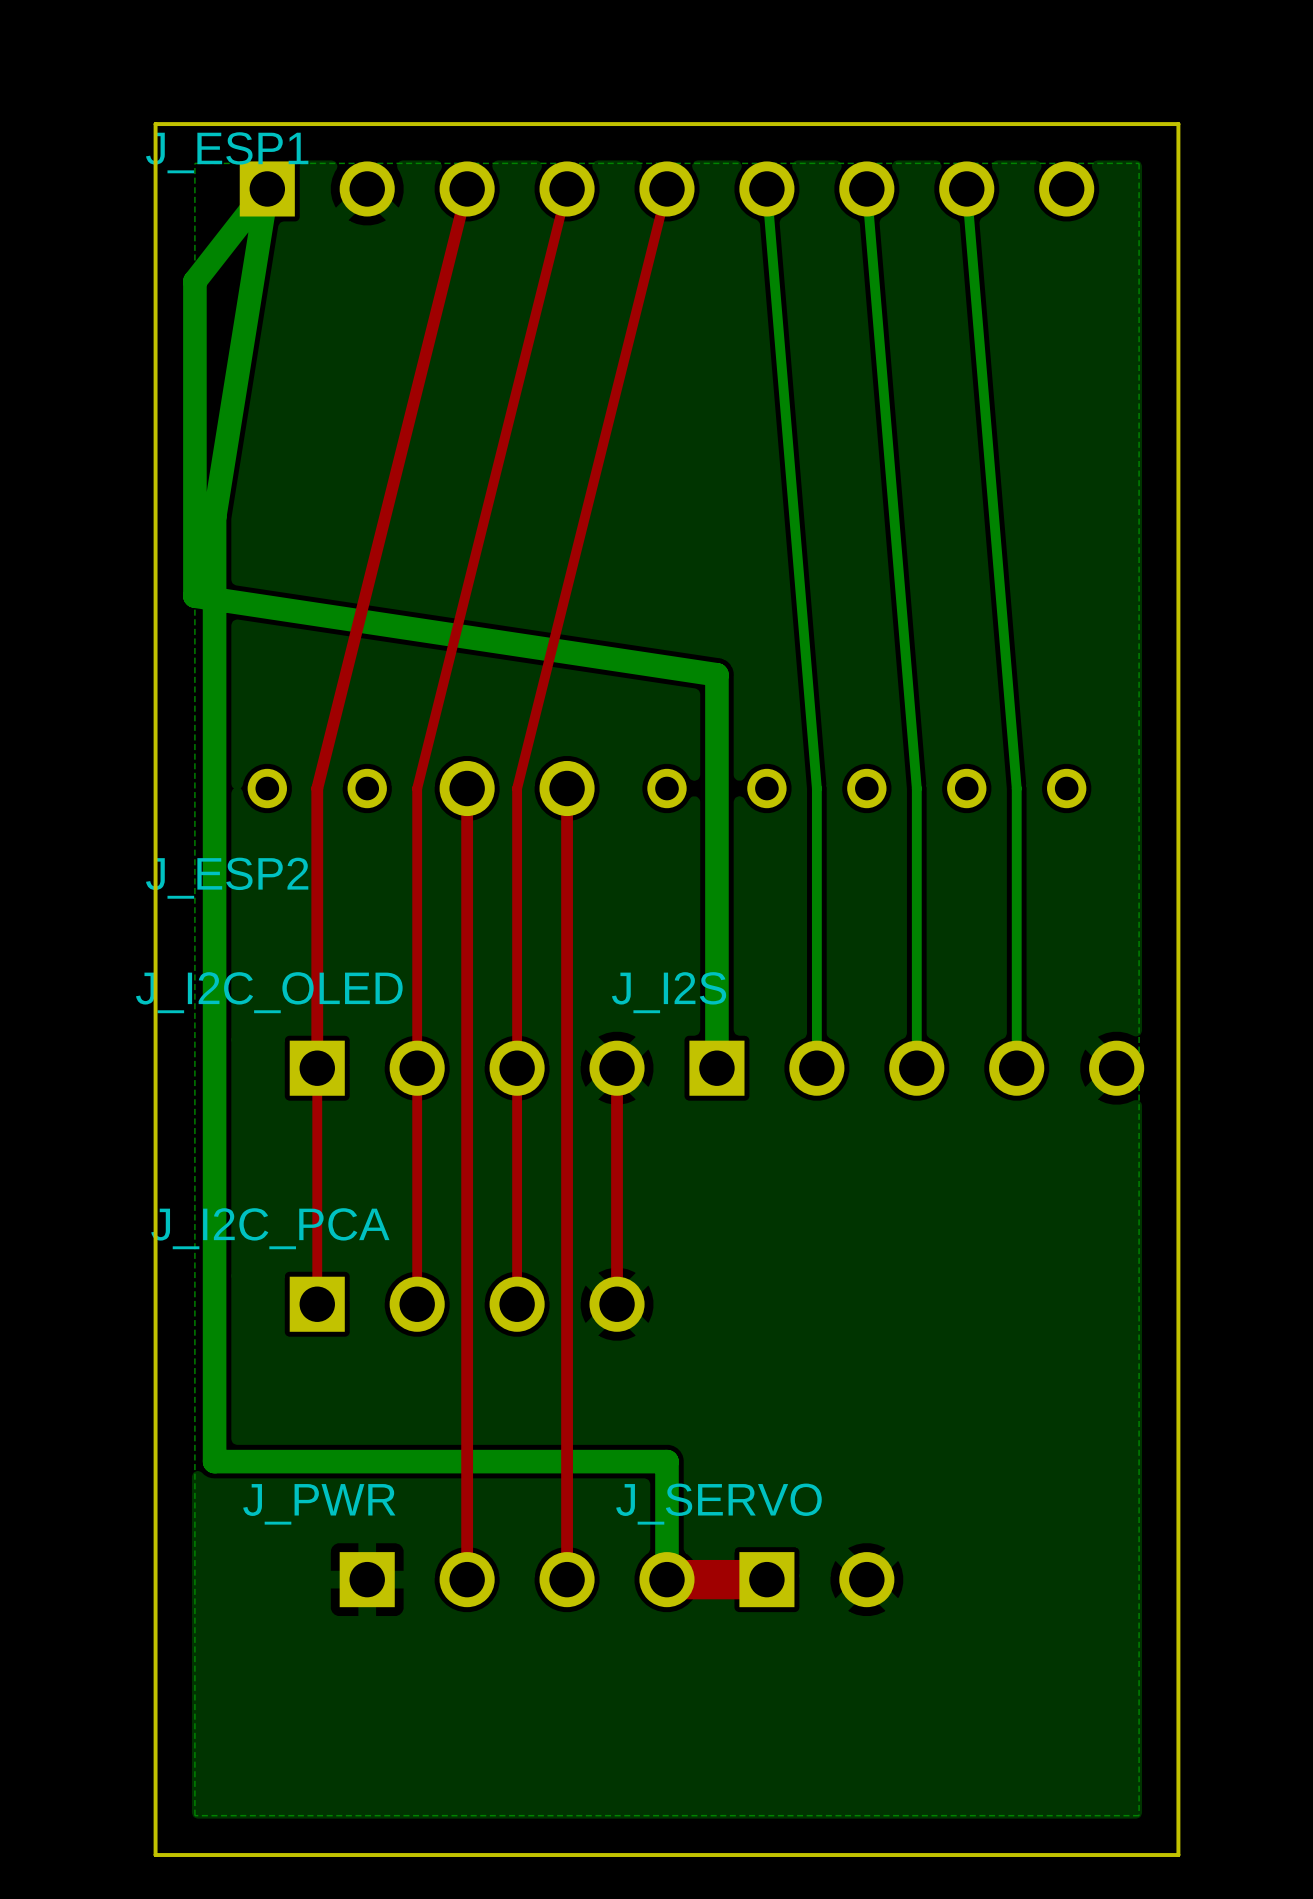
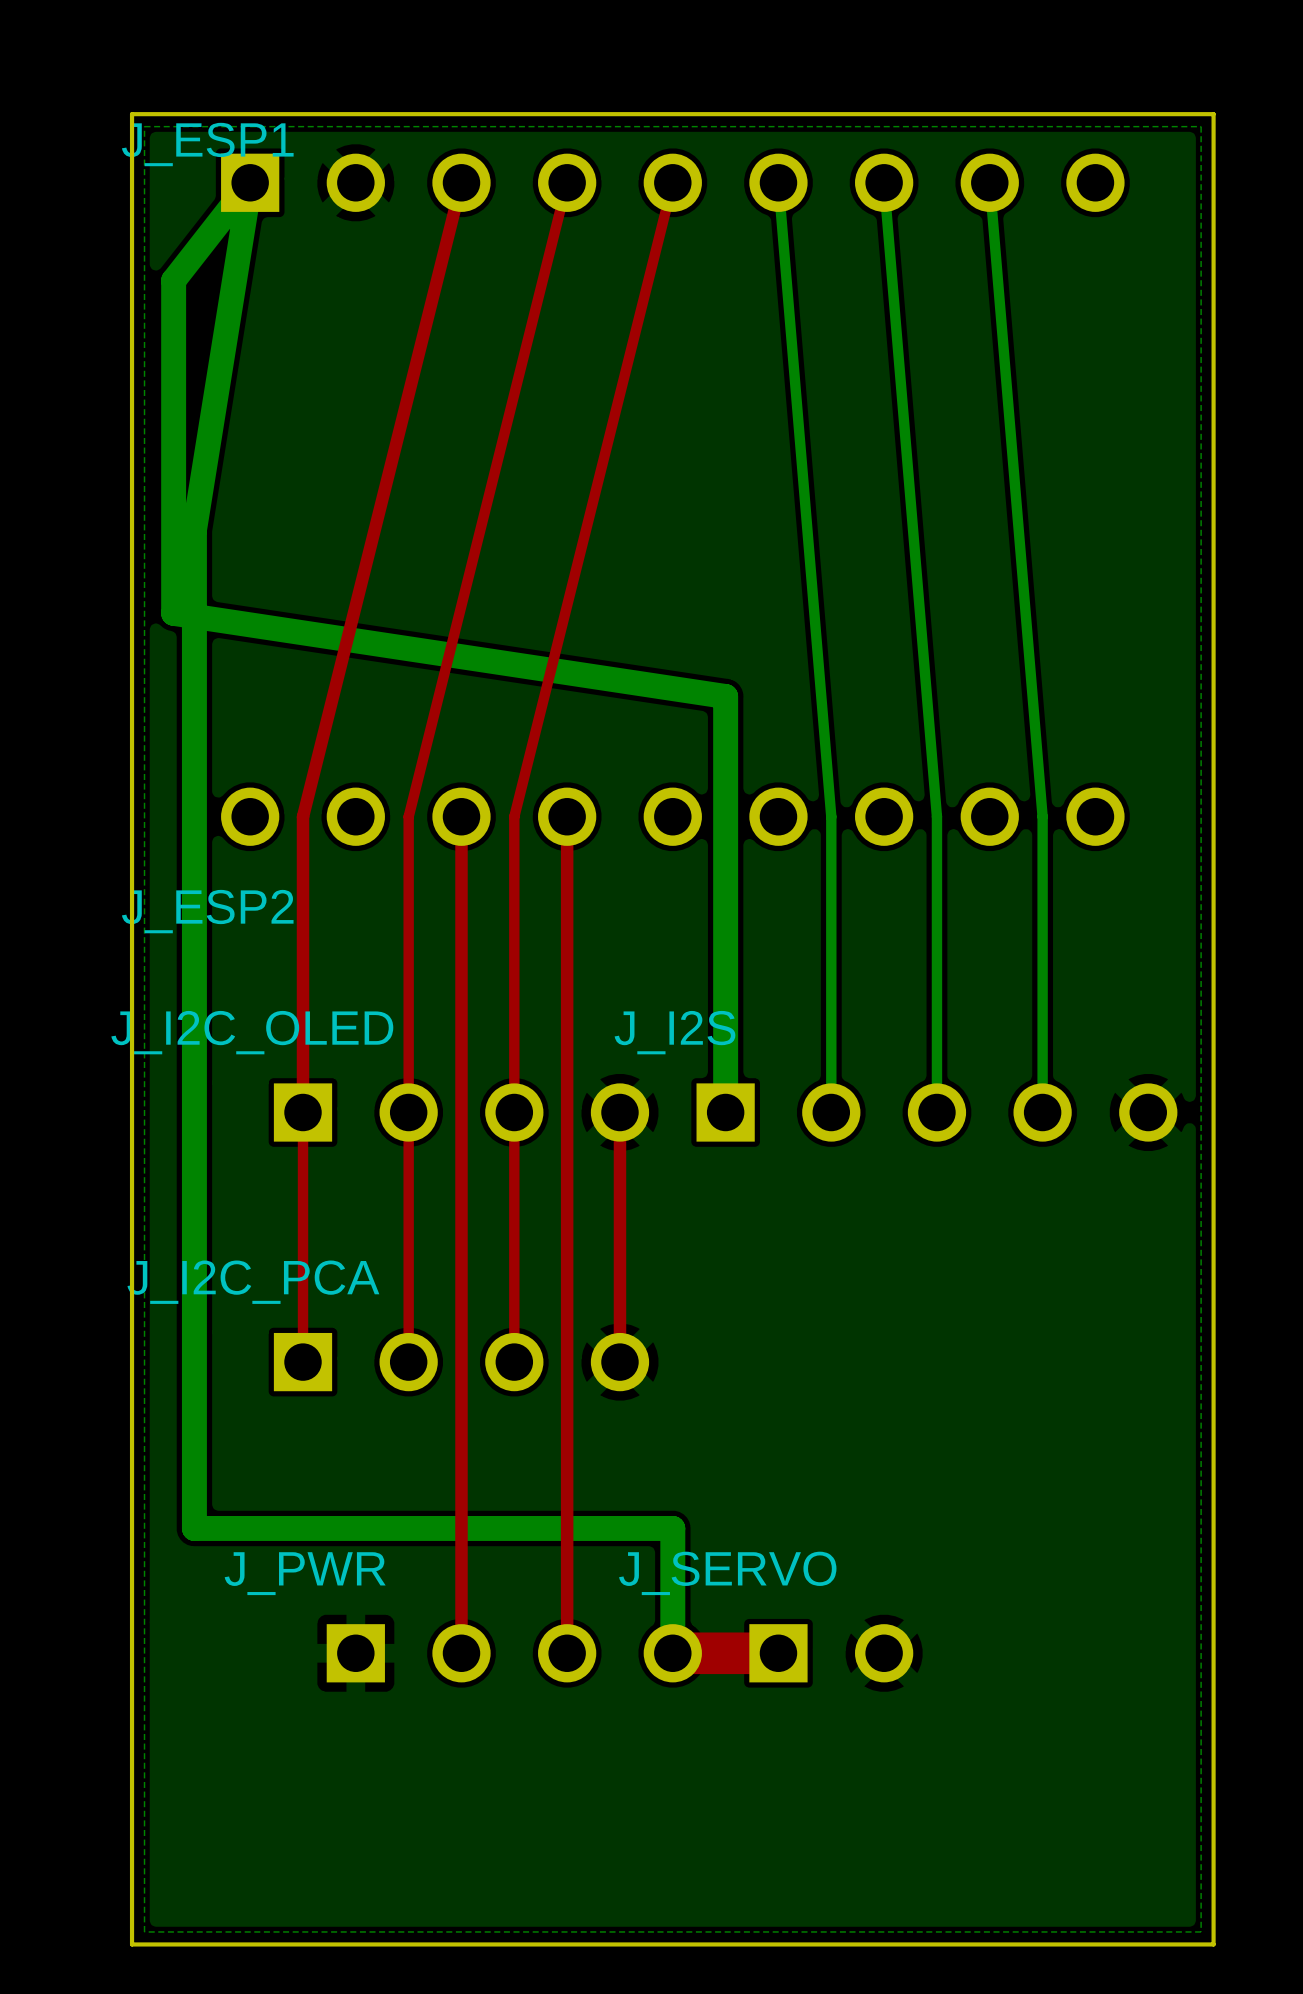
bottom zone outline: (194, 163) (1139, 163) (1139, 1815) (194, 1815) (194, 163) -> (144, 126) (144, 1931) (1201, 1931) (1201, 126) (144, 126)
J_ESP2 footprint: [247, 760, 1087, 817] -> [221, 787, 1125, 846]

